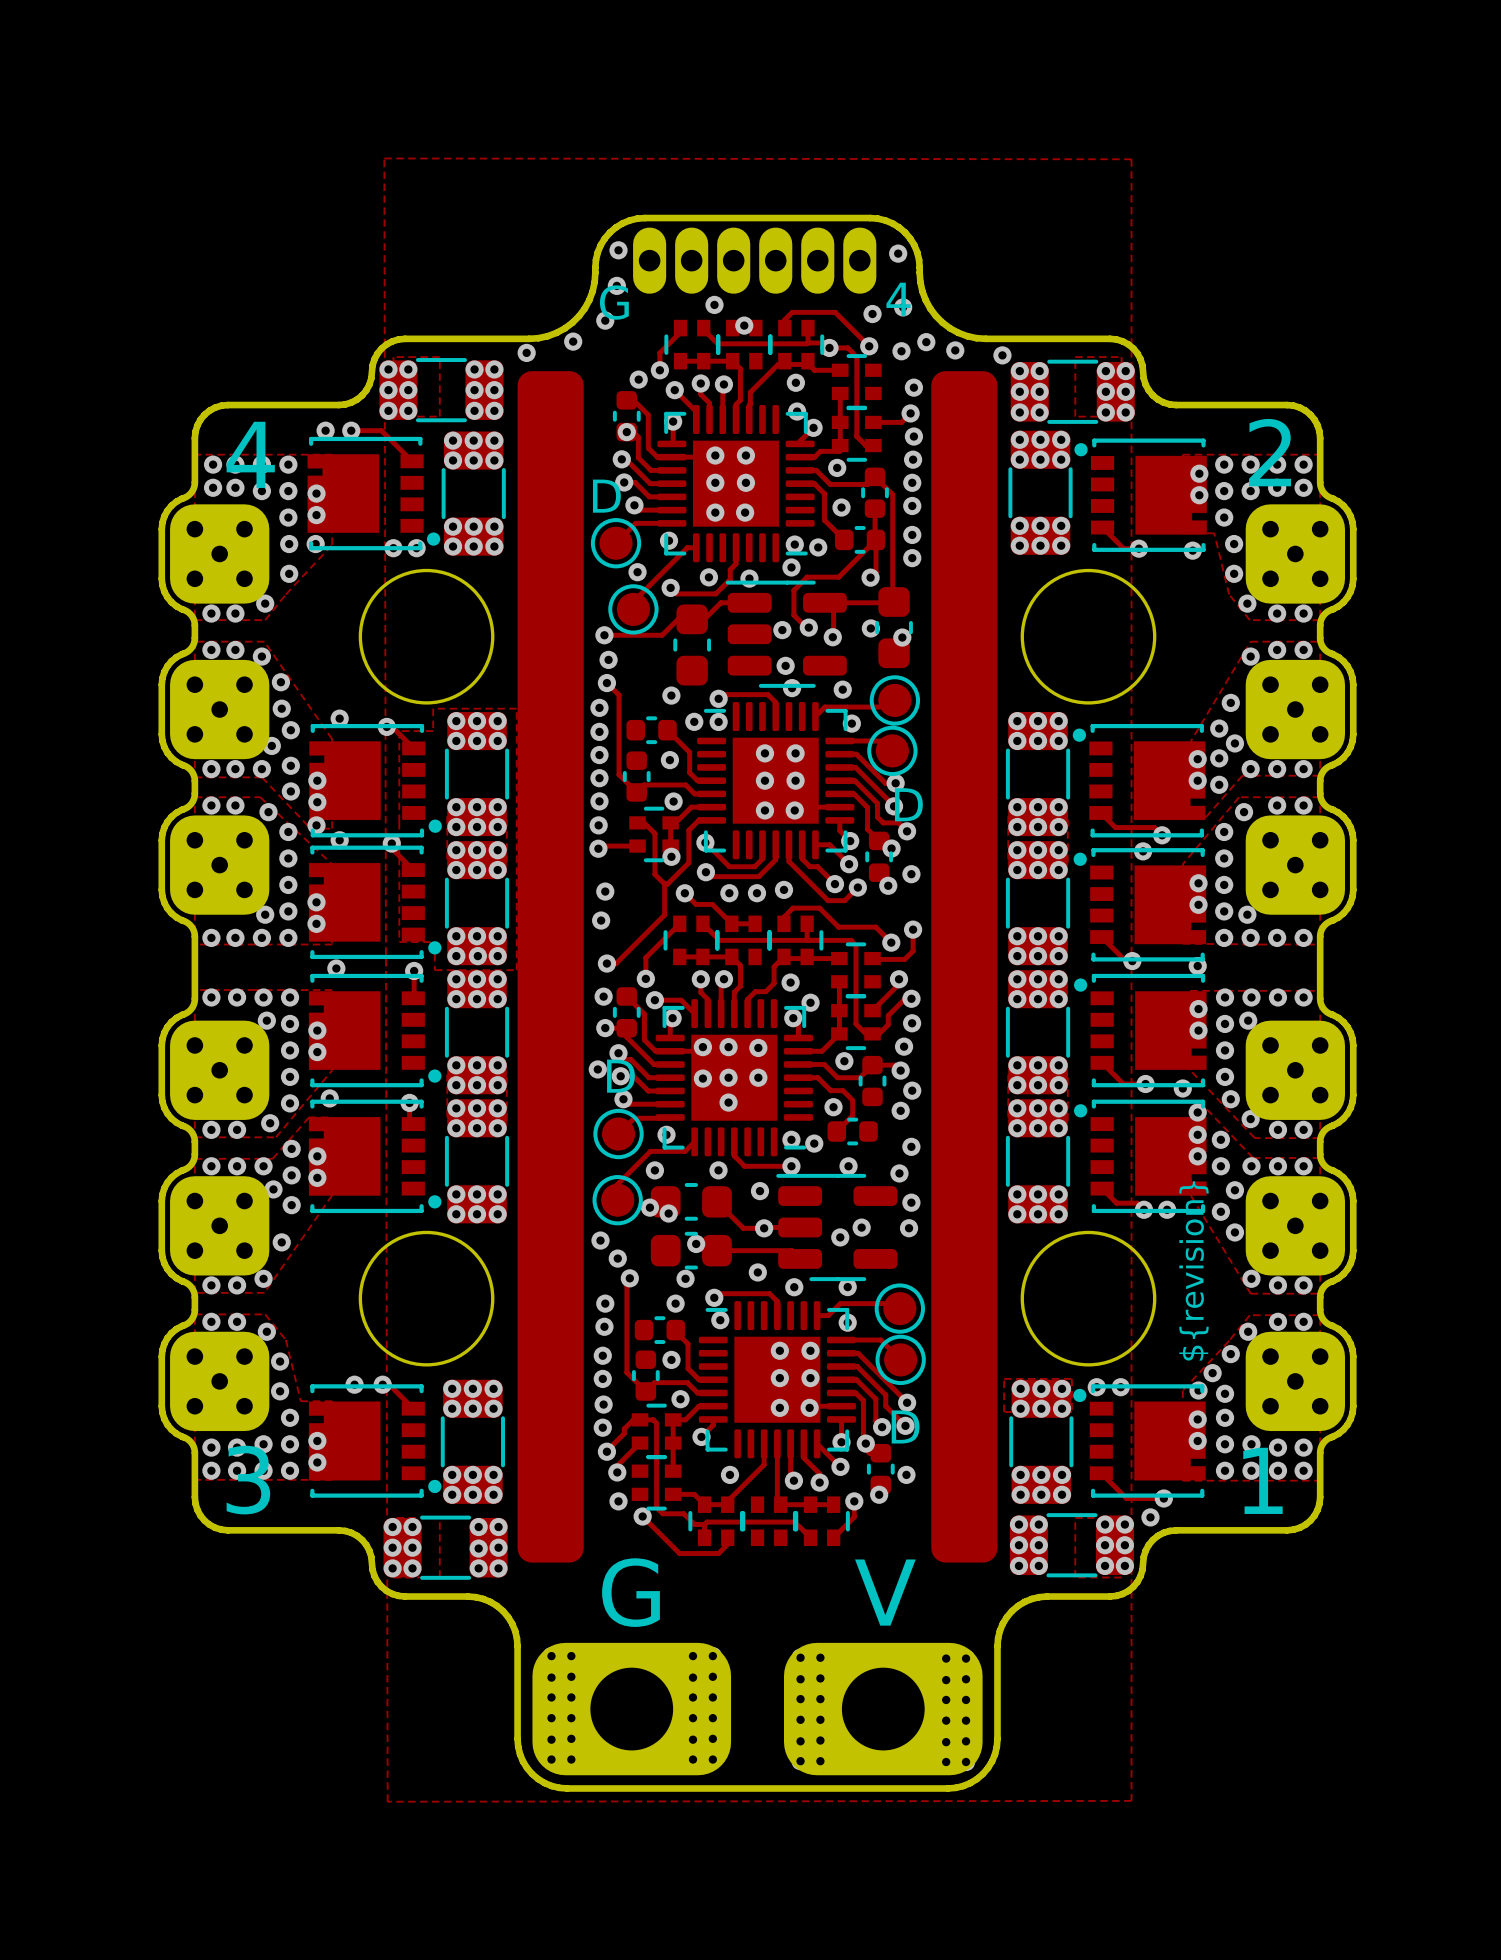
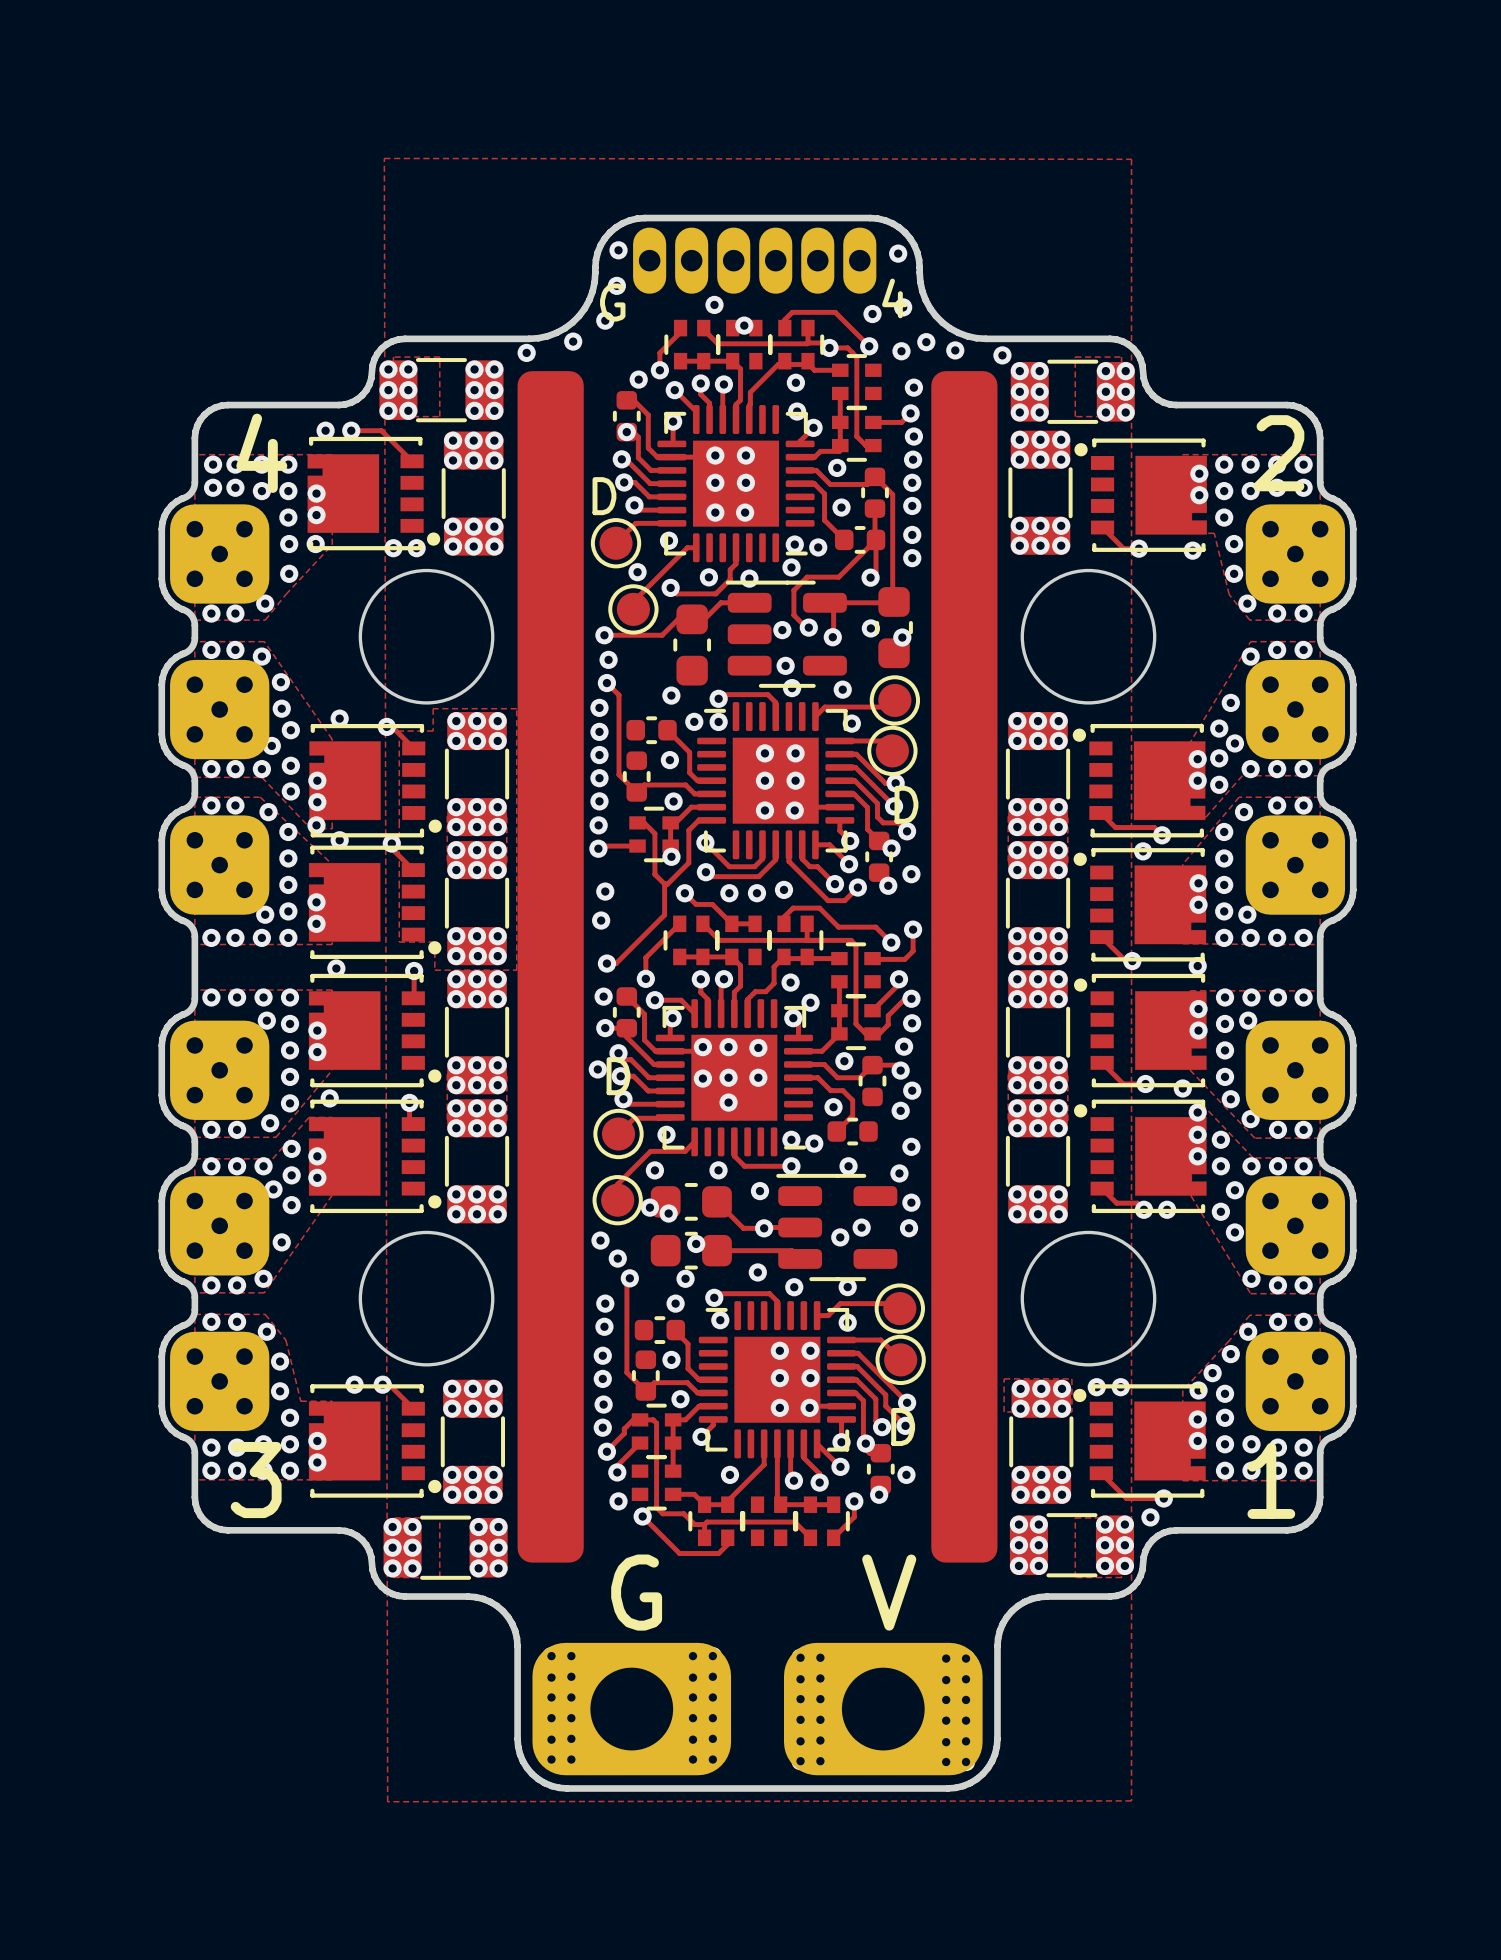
text: ${revision} (1194, 1270) -> none

